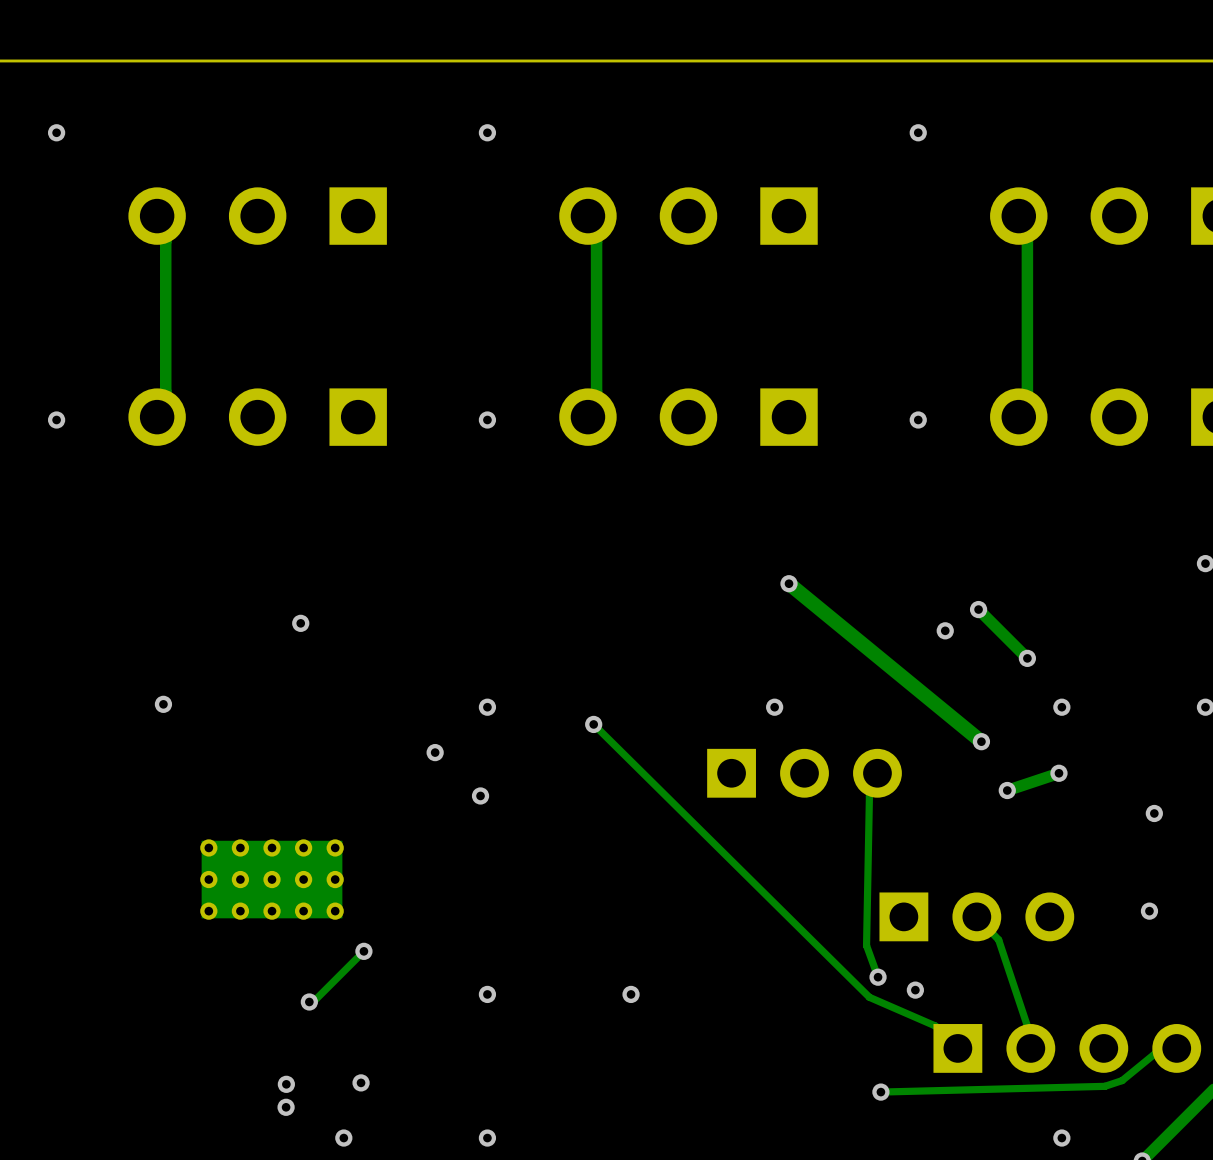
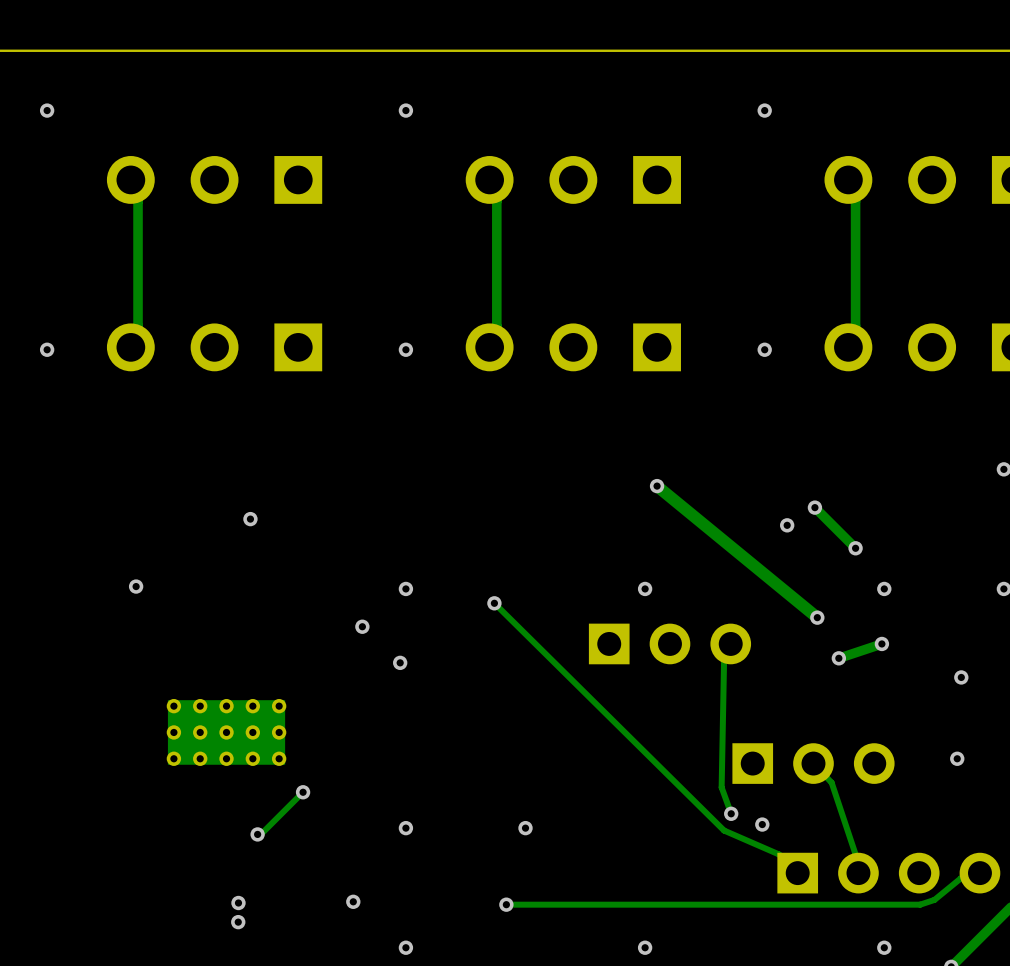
via: (361, 1082) -> none
via: none -> (353, 901)
via: none -> (506, 904)
track: (1104, 1086) (880, 1092) -> (920, 904) (506, 904)
via position: (880, 1092) -> (645, 947)
via: (343, 1138) -> none

